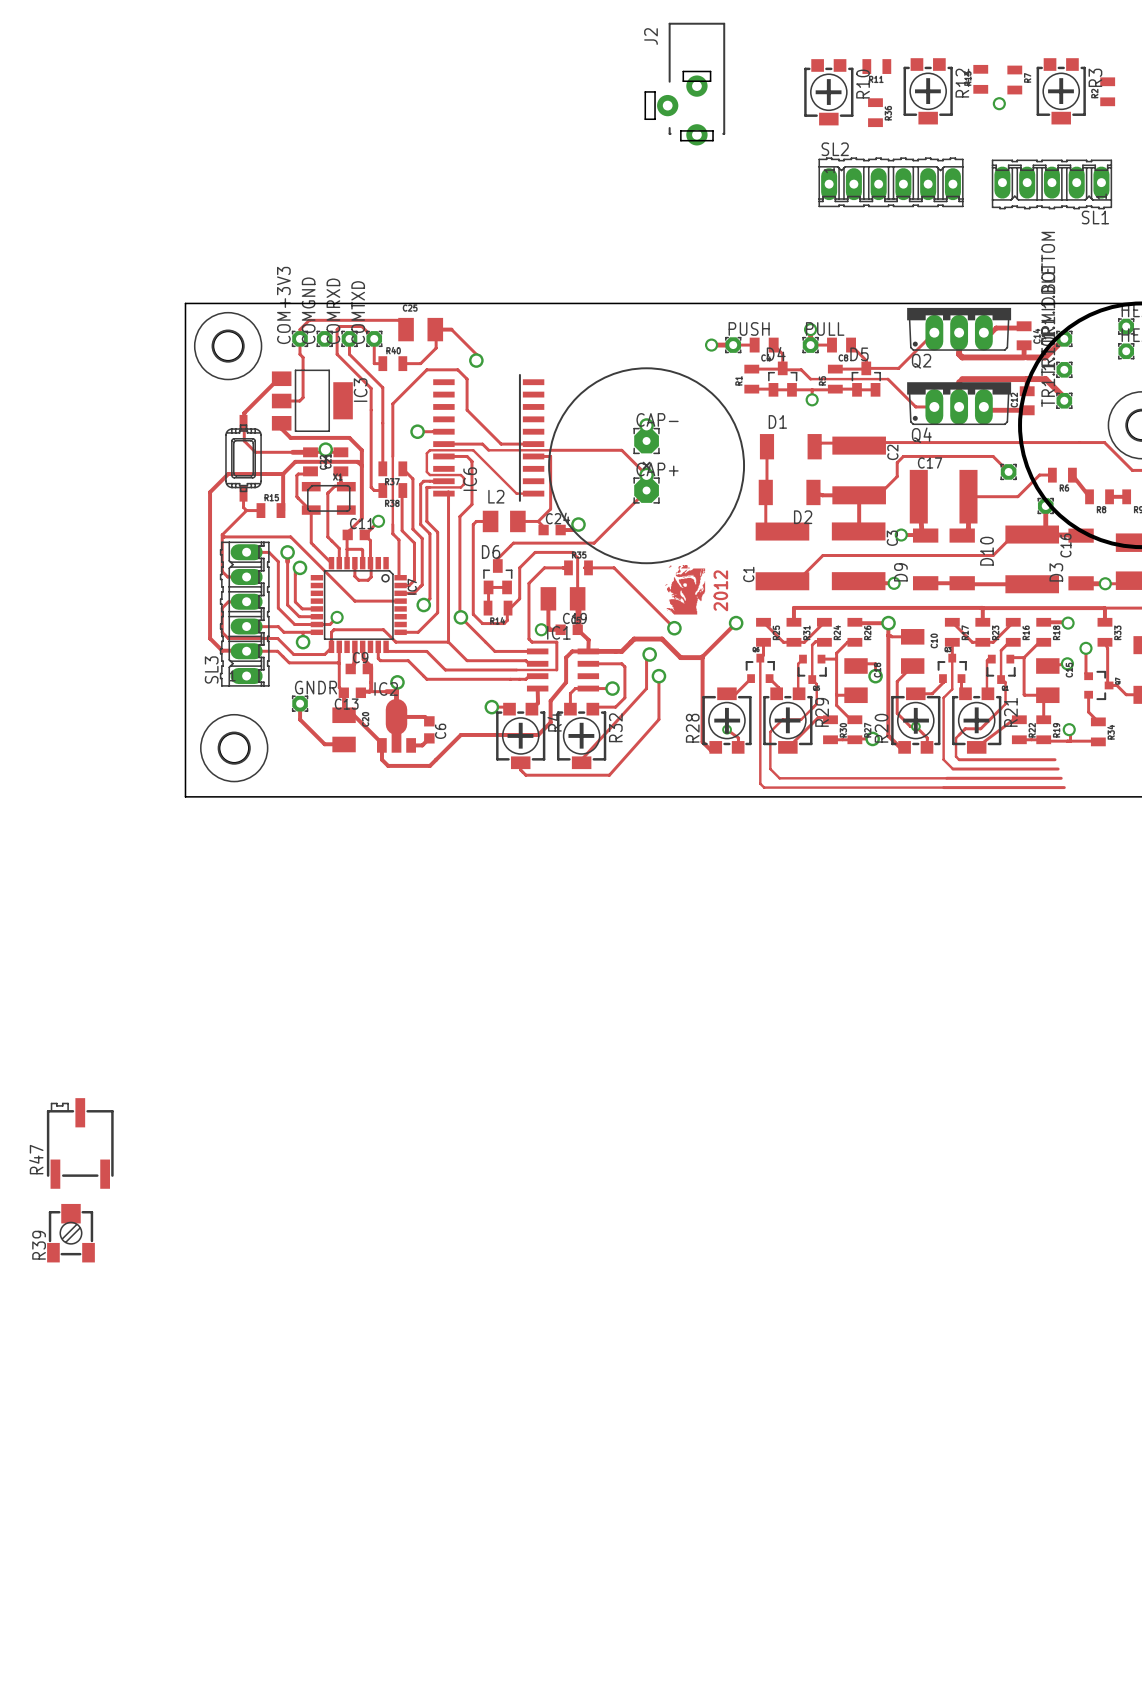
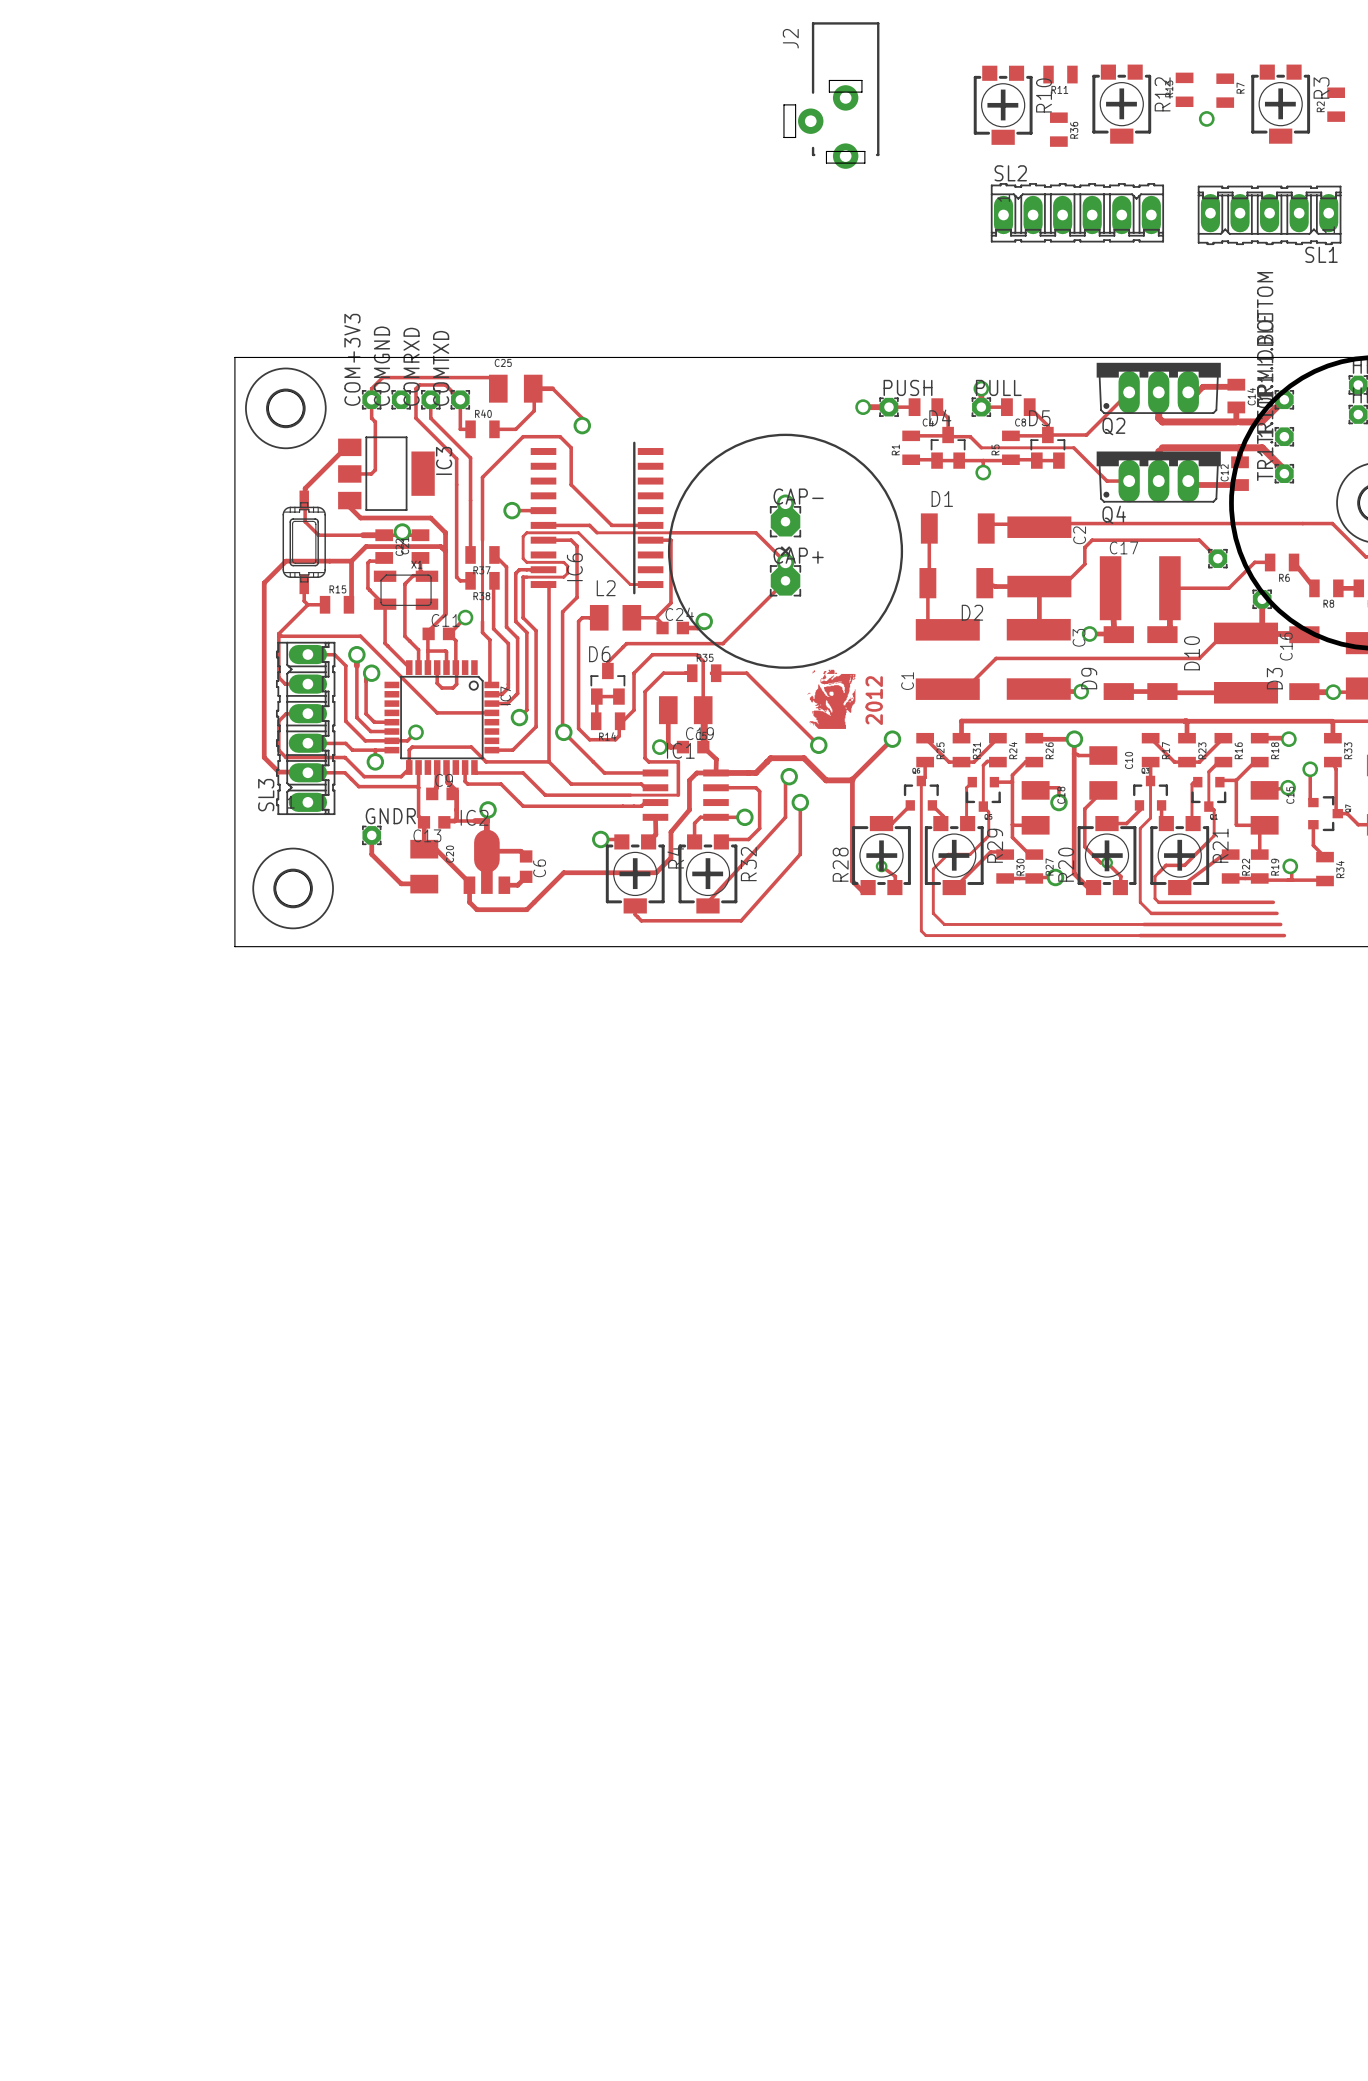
R47: (80, 1143) -> none
R39: (70, 1233) -> none

